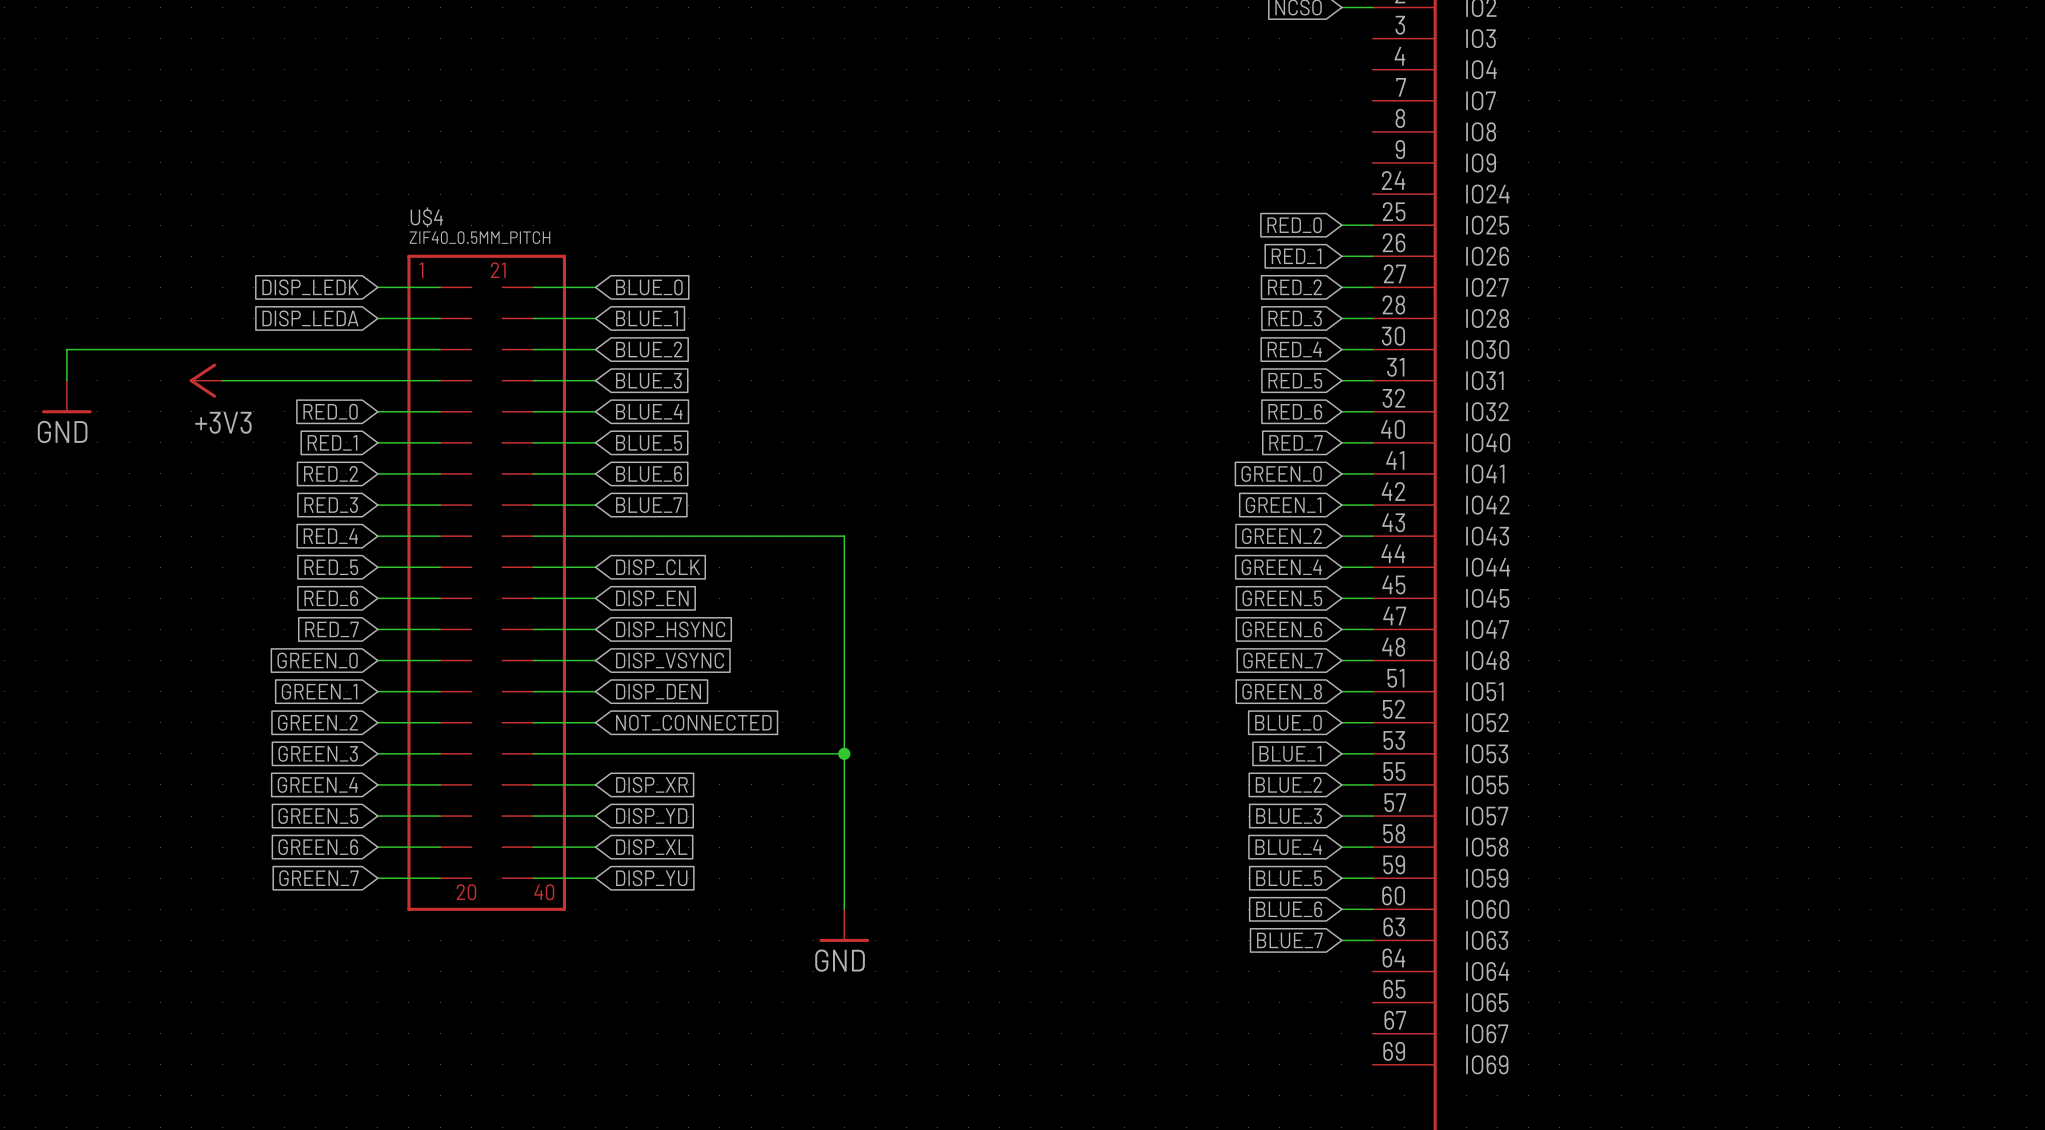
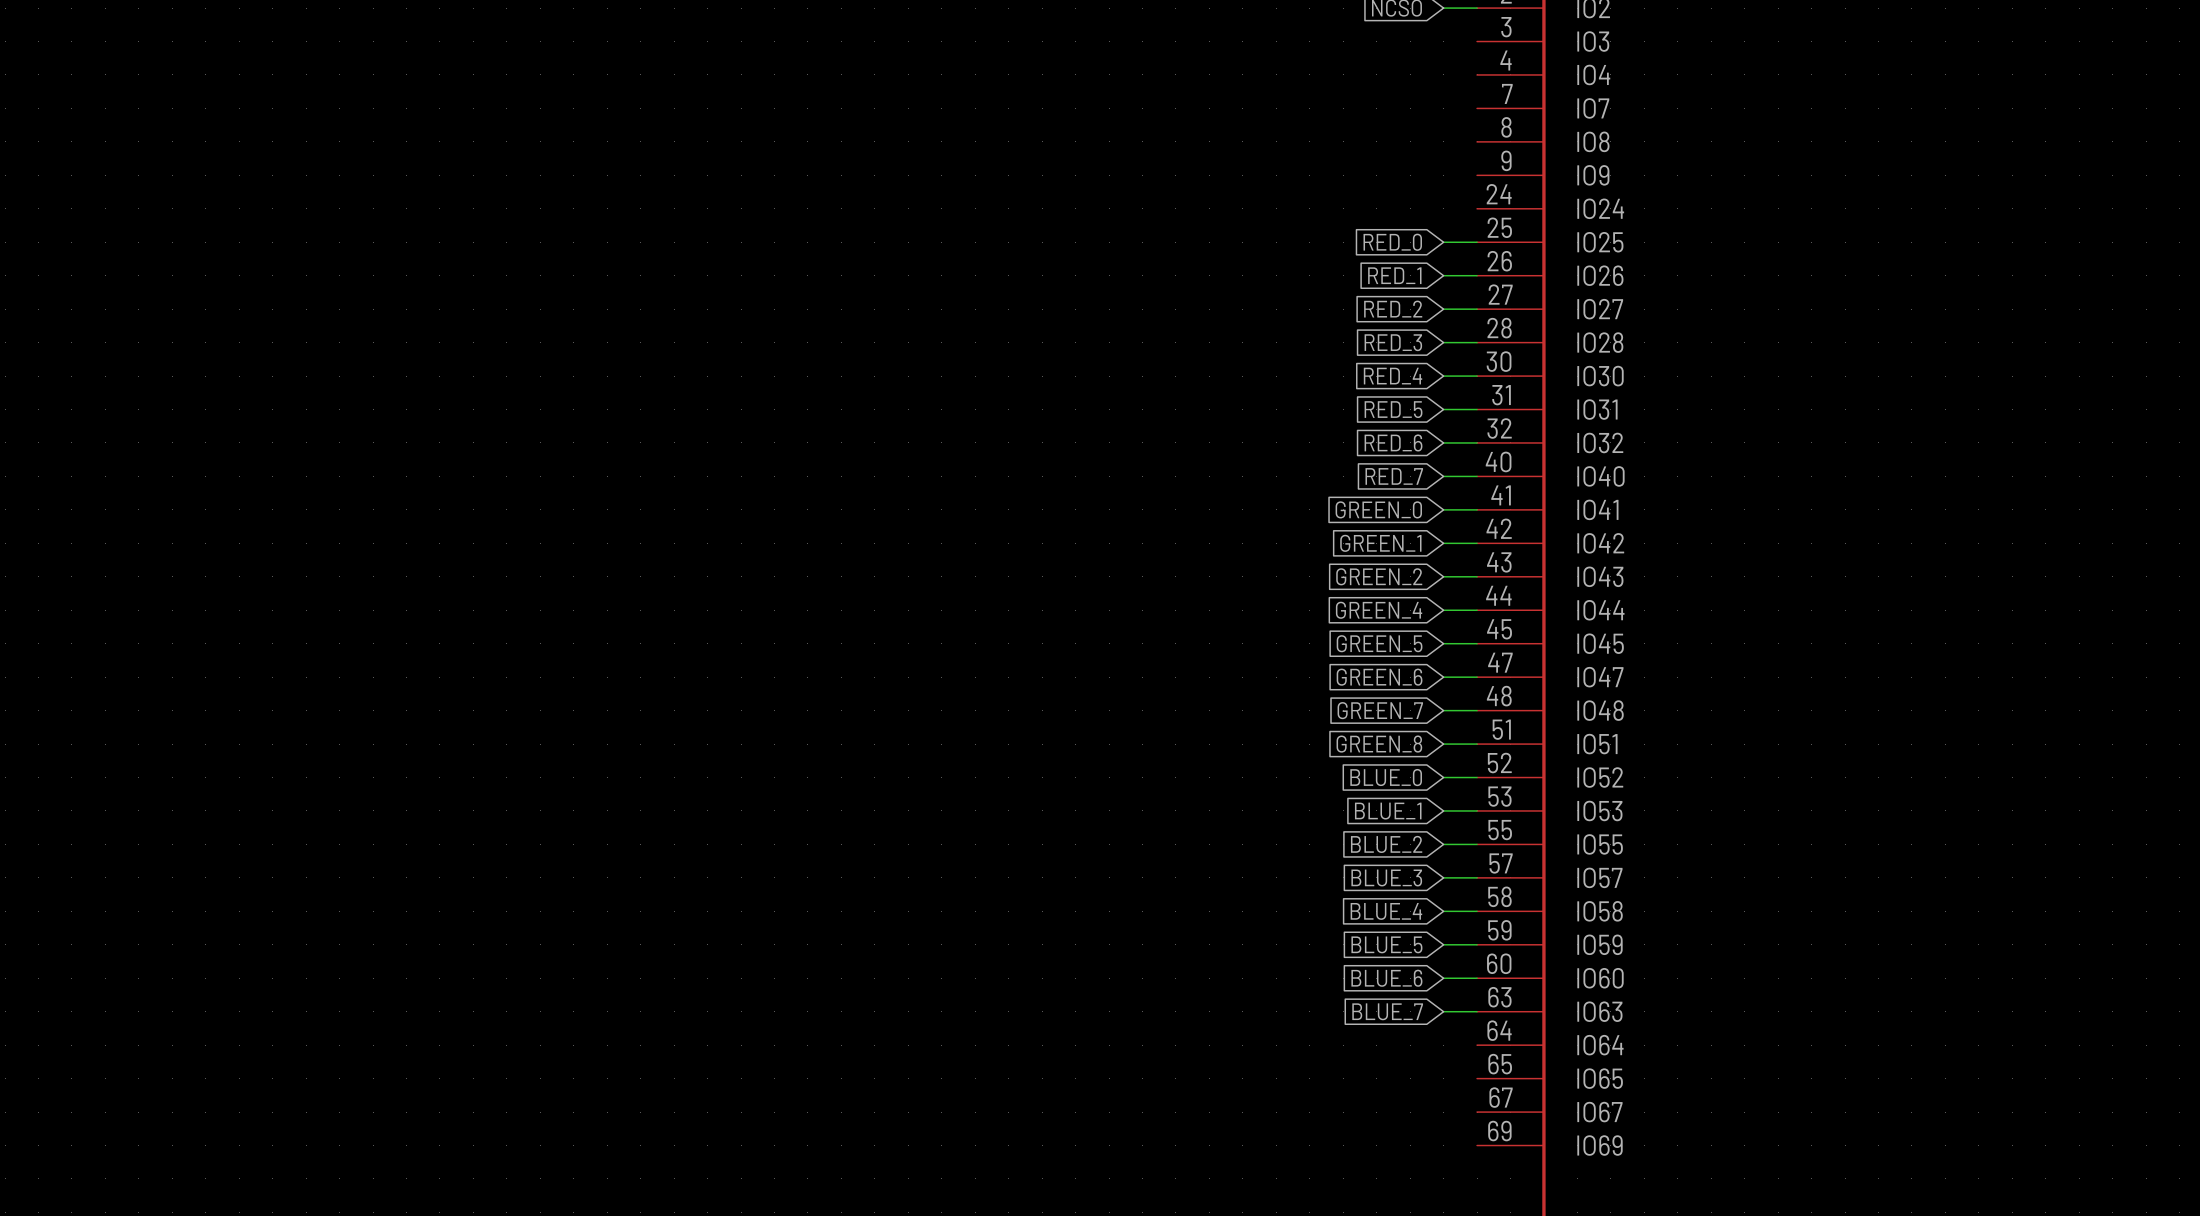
global label: DISP_LEDK (310, 287) -> none
wire: (377, 287) (440, 287) -> none
wire: (533, 287) (595, 287) -> none
global label: BLUE_0 (649, 287) -> none
global label: DISP_LEDA (310, 318) -> none
wire: (377, 318) (440, 318) -> none
wire: (533, 318) (595, 318) -> none
global label: BLUE_1 (647, 318) -> none
wire: (440, 349) (66, 349) (66, 380) -> none
wire: (533, 349) (595, 349) -> none
global label: BLUE_2 (649, 349) -> none
power symbol: +3V3 (206, 380) -> none
wire: (222, 380) (440, 380) -> none
wire: (533, 380) (595, 380) -> none
global label: BLUE_3 (648, 380) -> none
power symbol: GND (66, 397) -> none
global label: RED_0 (330, 411) -> none
wire: (377, 411) (440, 411) -> none
wire: (533, 411) (595, 411) -> none
global label: BLUE_4 (649, 411) -> none
global label: RED_1 (332, 442) -> none
wire: (377, 442) (440, 442) -> none
wire: (533, 442) (595, 442) -> none
global label: BLUE_5 (649, 442) -> none
global label: RED_2 (331, 473) -> none
wire: (377, 473) (440, 473) -> none
wire: (533, 473) (595, 473) -> none
global label: BLUE_6 (649, 473) -> none
global label: RED_3 (331, 505) -> none
wire: (377, 505) (440, 505) -> none
wire: (533, 505) (595, 505) -> none
global label: BLUE_7 (648, 505) -> none
global label: RED_4 (330, 536) -> none
wire: (377, 536) (440, 536) -> none
wire: (533, 536) (844, 536) (844, 909) -> none
global label: RED_5 (331, 567) -> none
wire: (377, 567) (440, 567) -> none
wire: (533, 567) (595, 567) -> none
global label: DISP_CLK (658, 567) -> none
U$4: ZIF40_0.5MM_PITCH (486, 582) -> none
global label: RED_6 (331, 598) -> none
wire: (377, 598) (440, 598) -> none
wire: (533, 598) (595, 598) -> none
global label: DISP_EN (652, 598) -> none
global label: RED_7 (332, 629) -> none
wire: (377, 629) (440, 629) -> none
wire: (533, 629) (595, 629) -> none
global label: DISP_HSYNC (670, 629) -> none
global label: GREEN_0 (317, 660) -> none
wire: (377, 660) (440, 660) -> none
wire: (533, 660) (595, 660) -> none
global label: DISP_VSYNC (670, 660) -> none
global label: GREEN_1 (319, 691) -> none
wire: (377, 691) (440, 691) -> none
wire: (533, 691) (595, 691) -> none
global label: DISP_DEN (658, 691) -> none
global label: GREEN_2 (318, 722) -> none
wire: (377, 722) (440, 722) -> none
wire: (533, 722) (595, 722) -> none
global label: NOT_CONNECTED (693, 722) -> none
global label: GREEN_3 (318, 753) -> none
wire: (377, 753) (440, 753) -> none
wire: (533, 753) (844, 753) -> none
junction: (844, 753) -> none
global label: GREEN_4 (317, 784) -> none
wire: (377, 784) (440, 784) -> none
wire: (533, 784) (595, 784) -> none
global label: DISP_XR (652, 784) -> none
global label: GREEN_5 (318, 816) -> none
wire: (377, 816) (440, 816) -> none
wire: (533, 816) (595, 816) -> none
global label: DISP_YD (651, 816) -> none
global label: GREEN_6 (318, 847) -> none
wire: (377, 847) (440, 847) -> none
wire: (533, 847) (595, 847) -> none
global label: DISP_XL (651, 847) -> none
global label: GREEN_7 (319, 878) -> none
wire: (377, 878) (440, 878) -> none
wire: (533, 878) (595, 878) -> none
global label: DISP_YU (651, 878) -> none
power symbol: GND (844, 925) -> none

